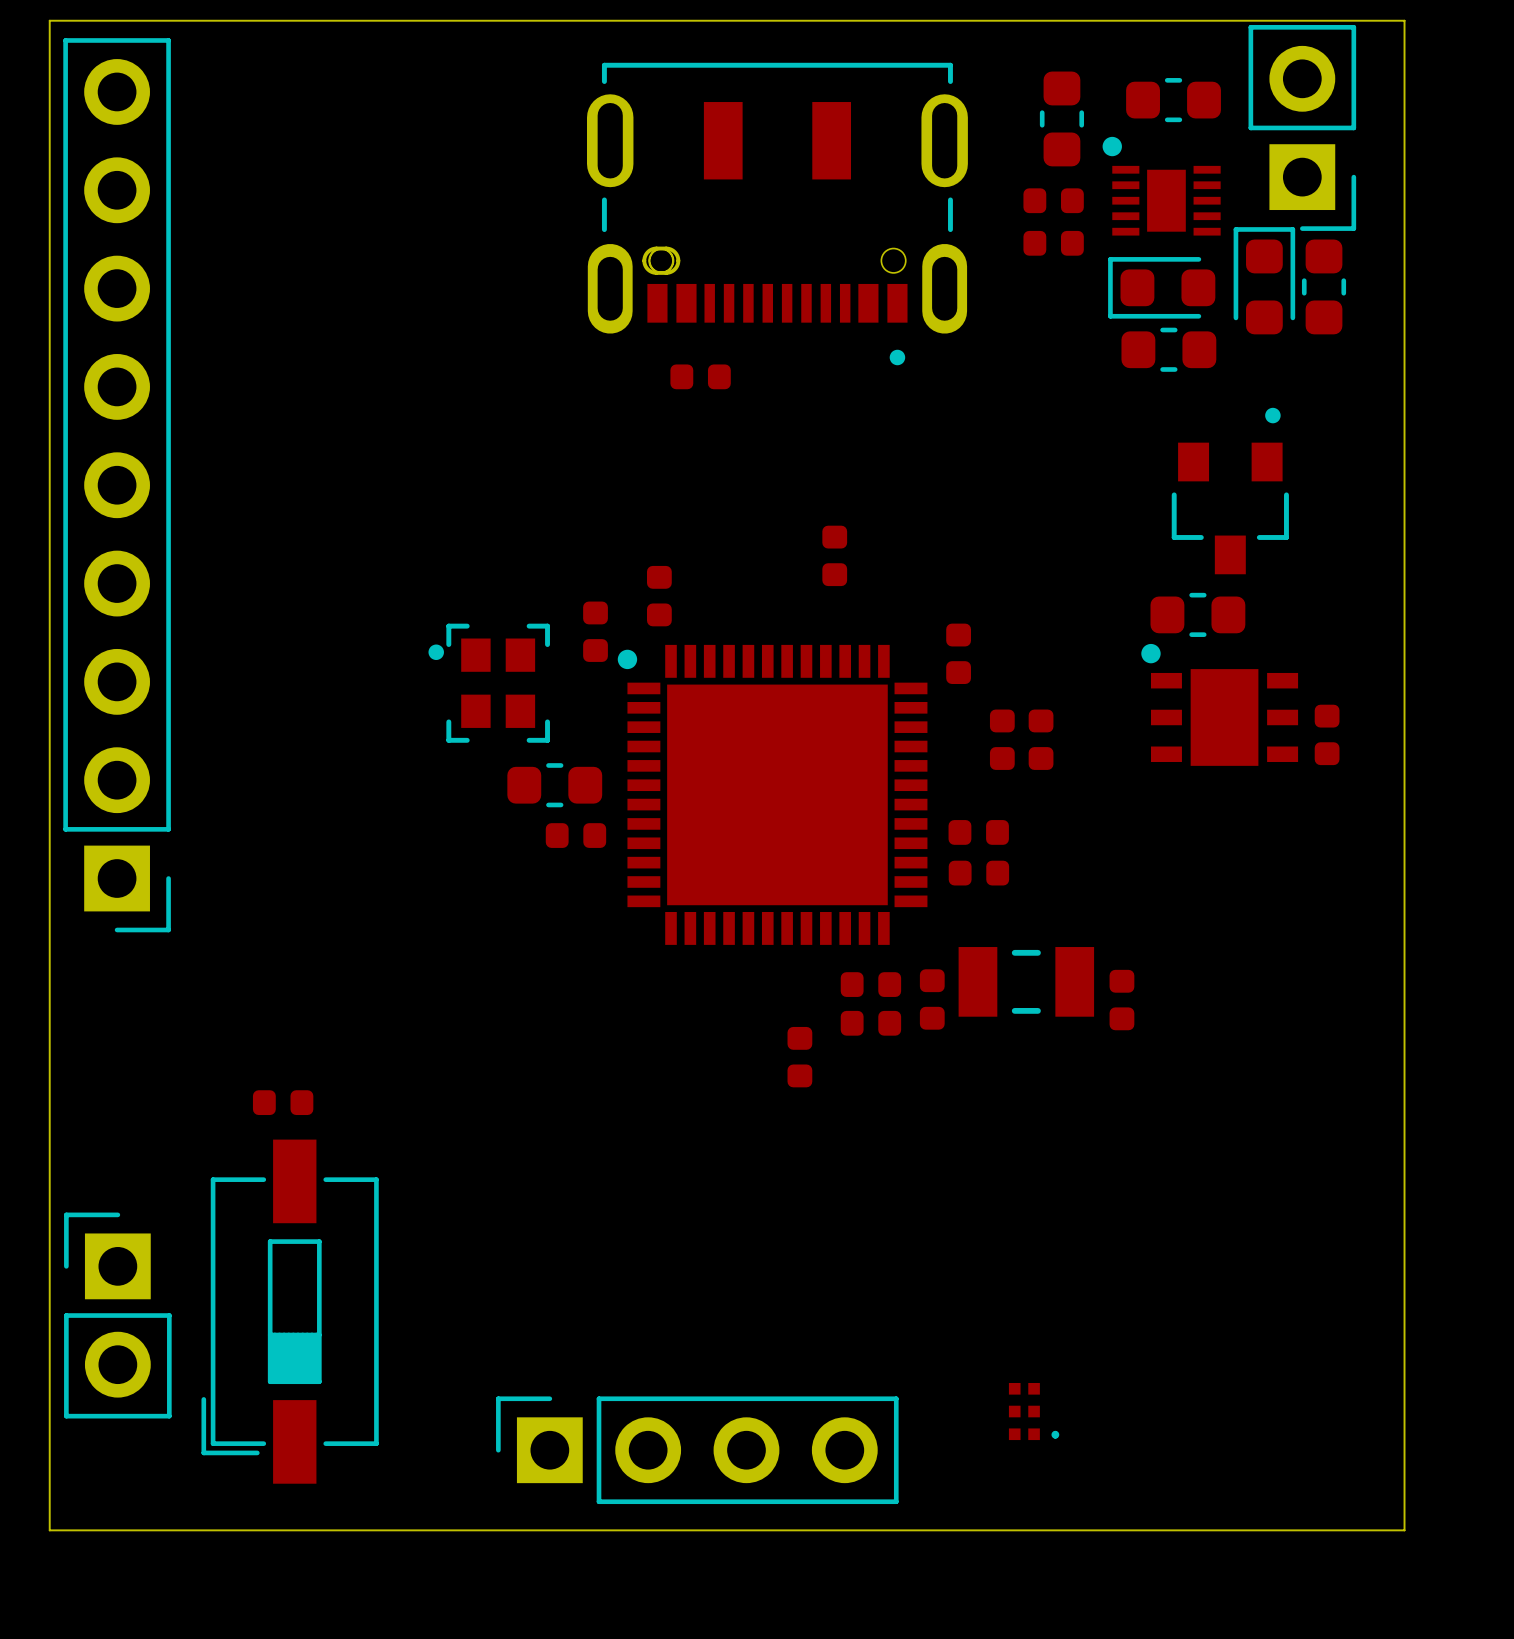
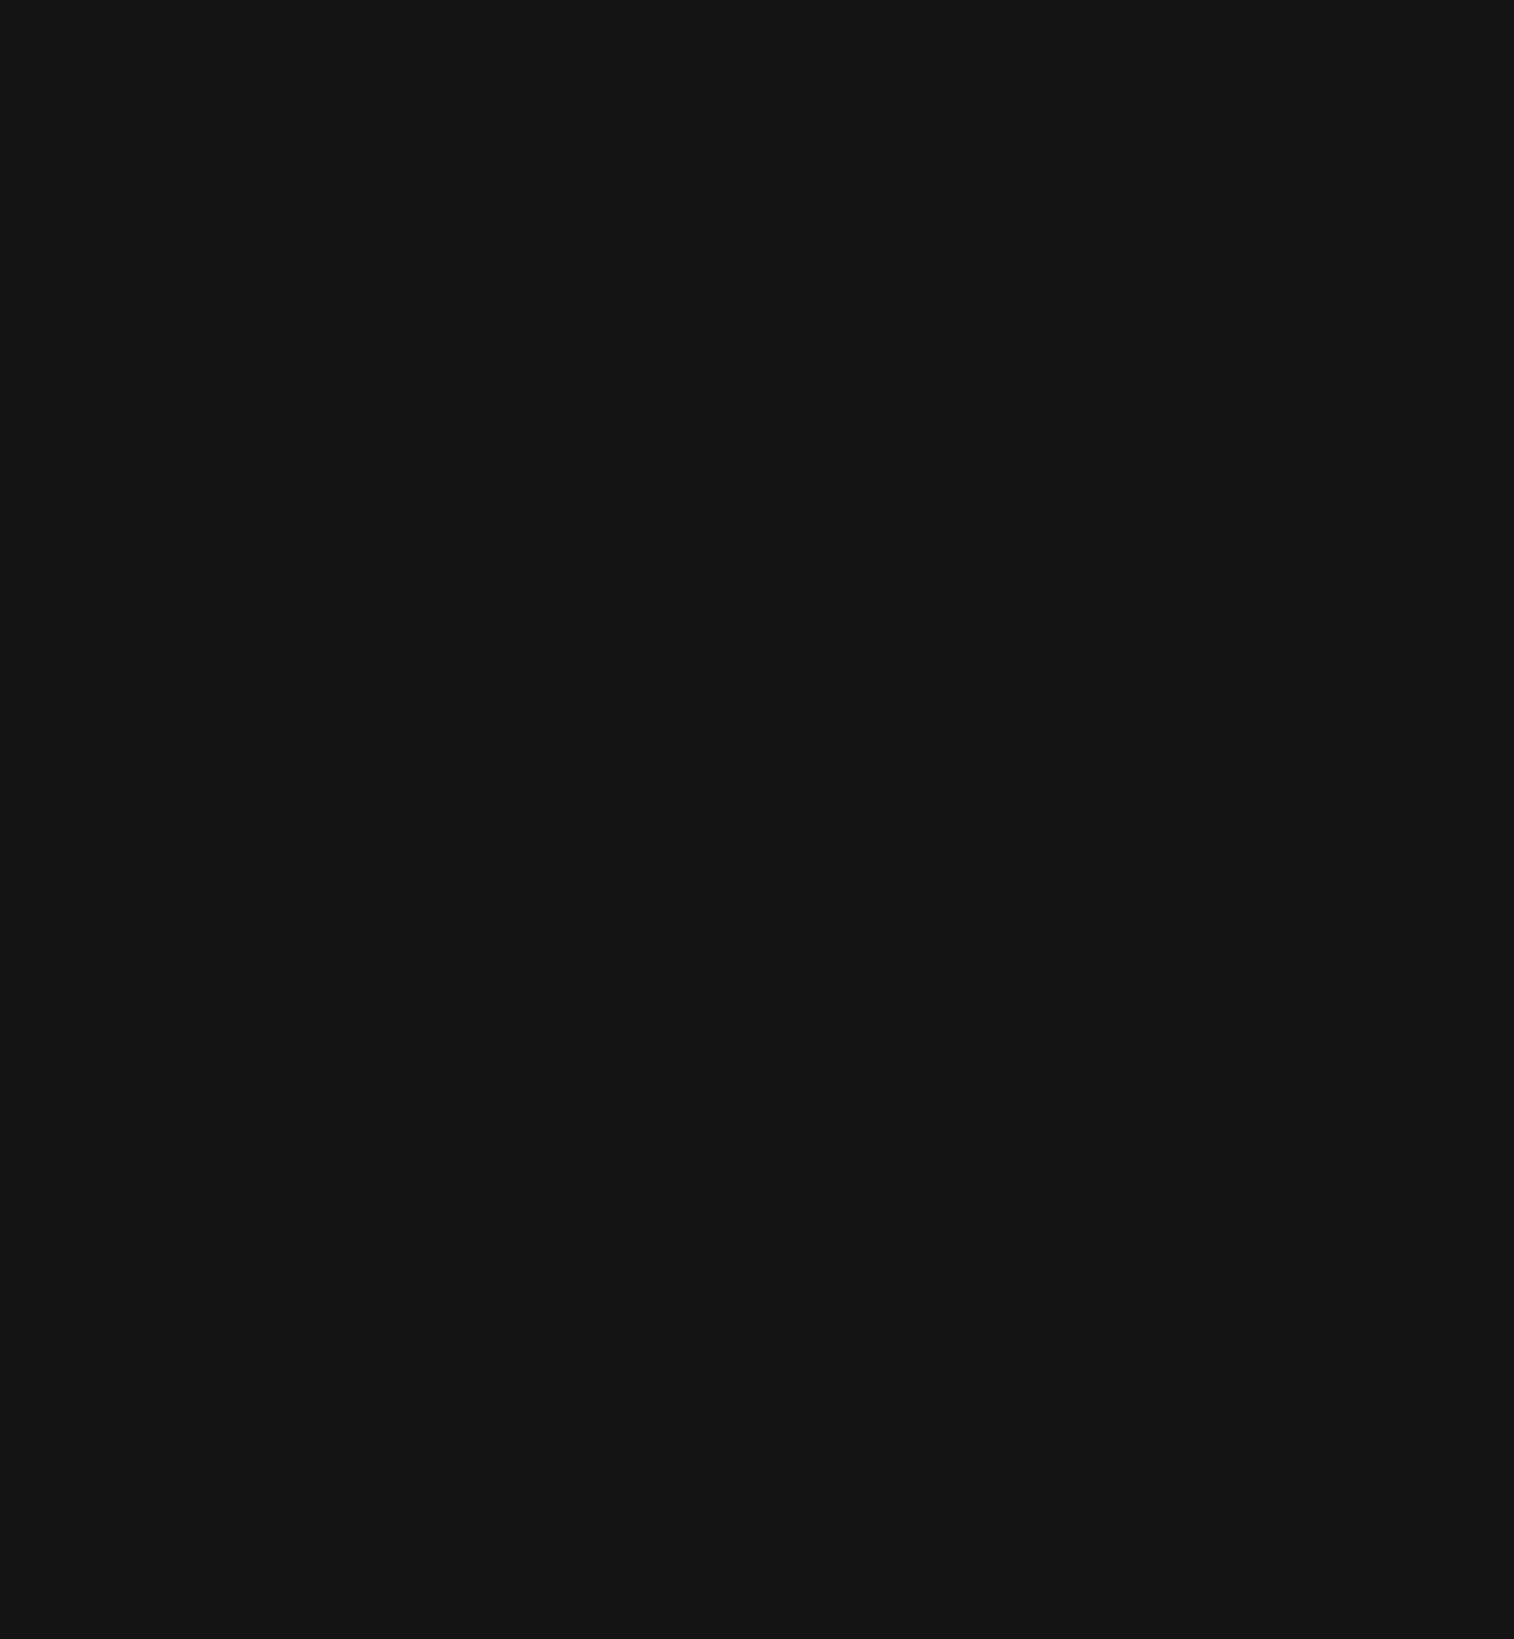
board edge: (49, 20) (49, 1530) (1404, 1530) (1404, 20) (49, 20) -> none
part: (1173, 100) -> none
part: (1061, 118) -> none
part: (1302, 127) -> none
part: (1161, 186) -> none
part: (1053, 200) -> none
part: (777, 214) -> none
part: (1053, 243) -> none
part: (1264, 280) -> none
part: (1324, 286) -> none
part: (1161, 287) -> none
part: (1168, 349) -> none
part: (700, 376) -> none
part: (117, 485) -> none
part: (1230, 491) -> none
part: (834, 555) -> none
part: (659, 596) -> none
part: (1197, 614) -> none
part: (595, 631) -> none
part: (958, 653) -> none
part: (489, 683) -> none
part: (1219, 704) -> none
part: (1327, 734) -> none
part: (1002, 739) -> none
part: (1041, 739) -> none
part: (554, 785) -> none
part: (772, 794) -> none
part: (978, 832) -> none
part: (575, 835) -> none
part: (978, 873) -> none
part: (1026, 981) -> none
part: (870, 984) -> none
part: (932, 999) -> none
part: (1121, 1000) -> none
part: (870, 1023) -> none
part: (799, 1057) -> none
part: (283, 1102) -> none
part: (290, 1311) -> none
part: (117, 1315) -> none
part: (1034, 1411) -> none
part: (697, 1450) -> none

